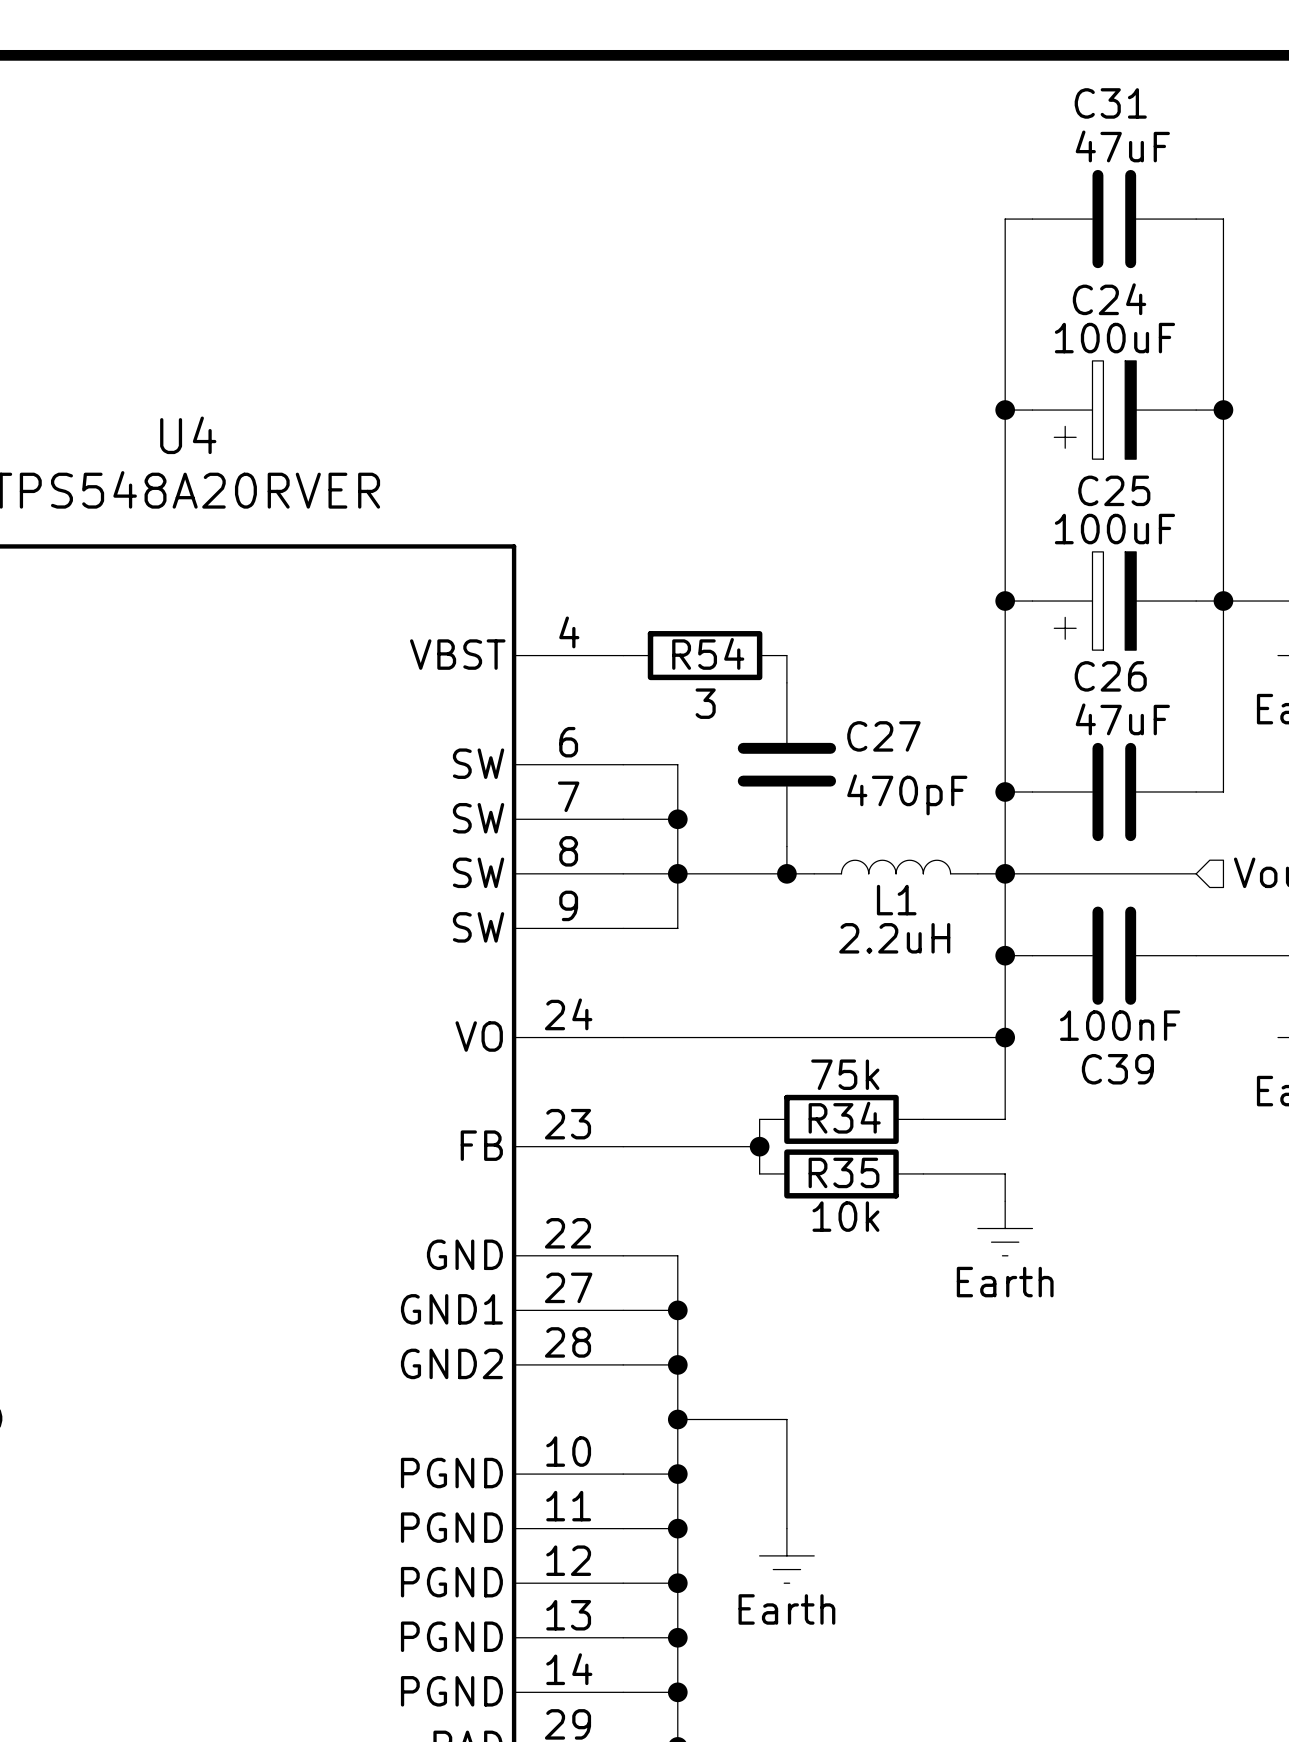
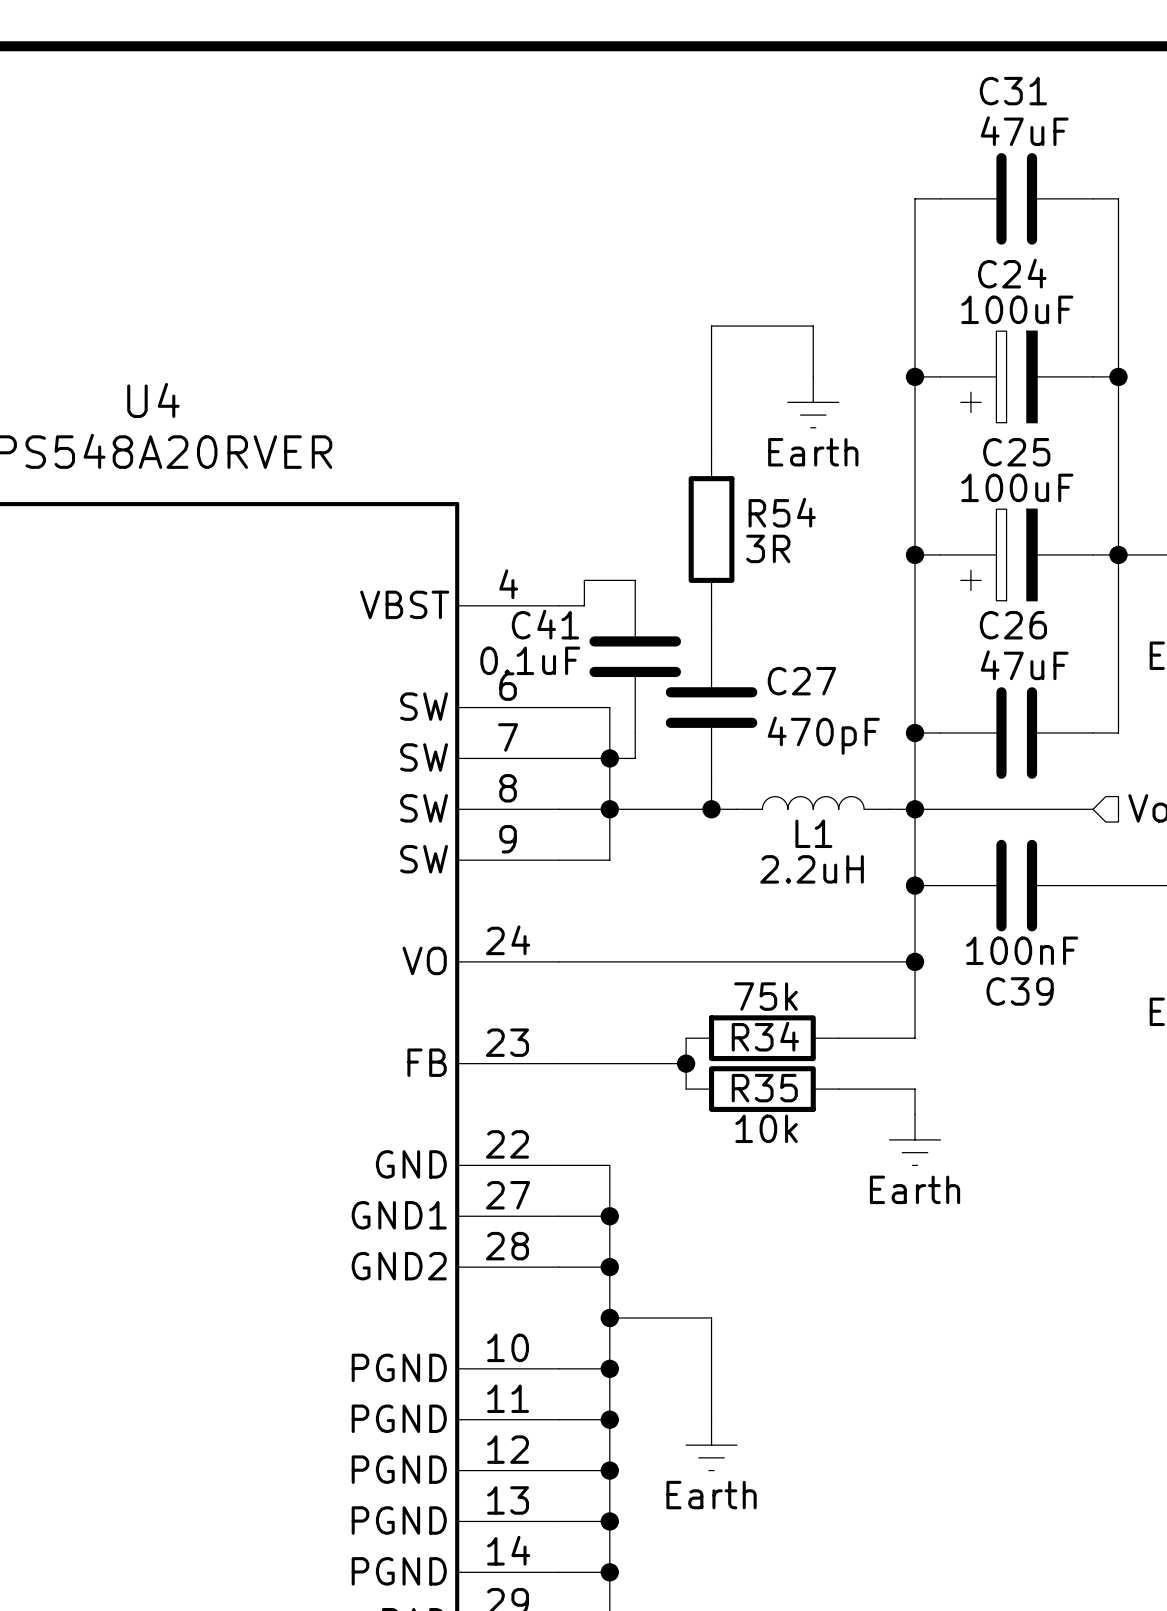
wire: none -> (813, 376) (813, 326) (711, 326) (711, 453)
power symbol: none -> Earth (813, 402)
wire: none -> (635, 580) (584, 580) (584, 605) (558, 605)
R54 name position: R54 (708, 653) -> R54 (782, 512)
R54 rotation: 0° (705, 655) -> 90° clockwise (711, 529)
R54 position: (705, 655) -> (711, 529)
R54 value: 3 (705, 703) -> 3R (768, 548)
C41: none -> 0.1uF (635, 656)
wire: none -> (635, 732) (635, 758) (609, 758)

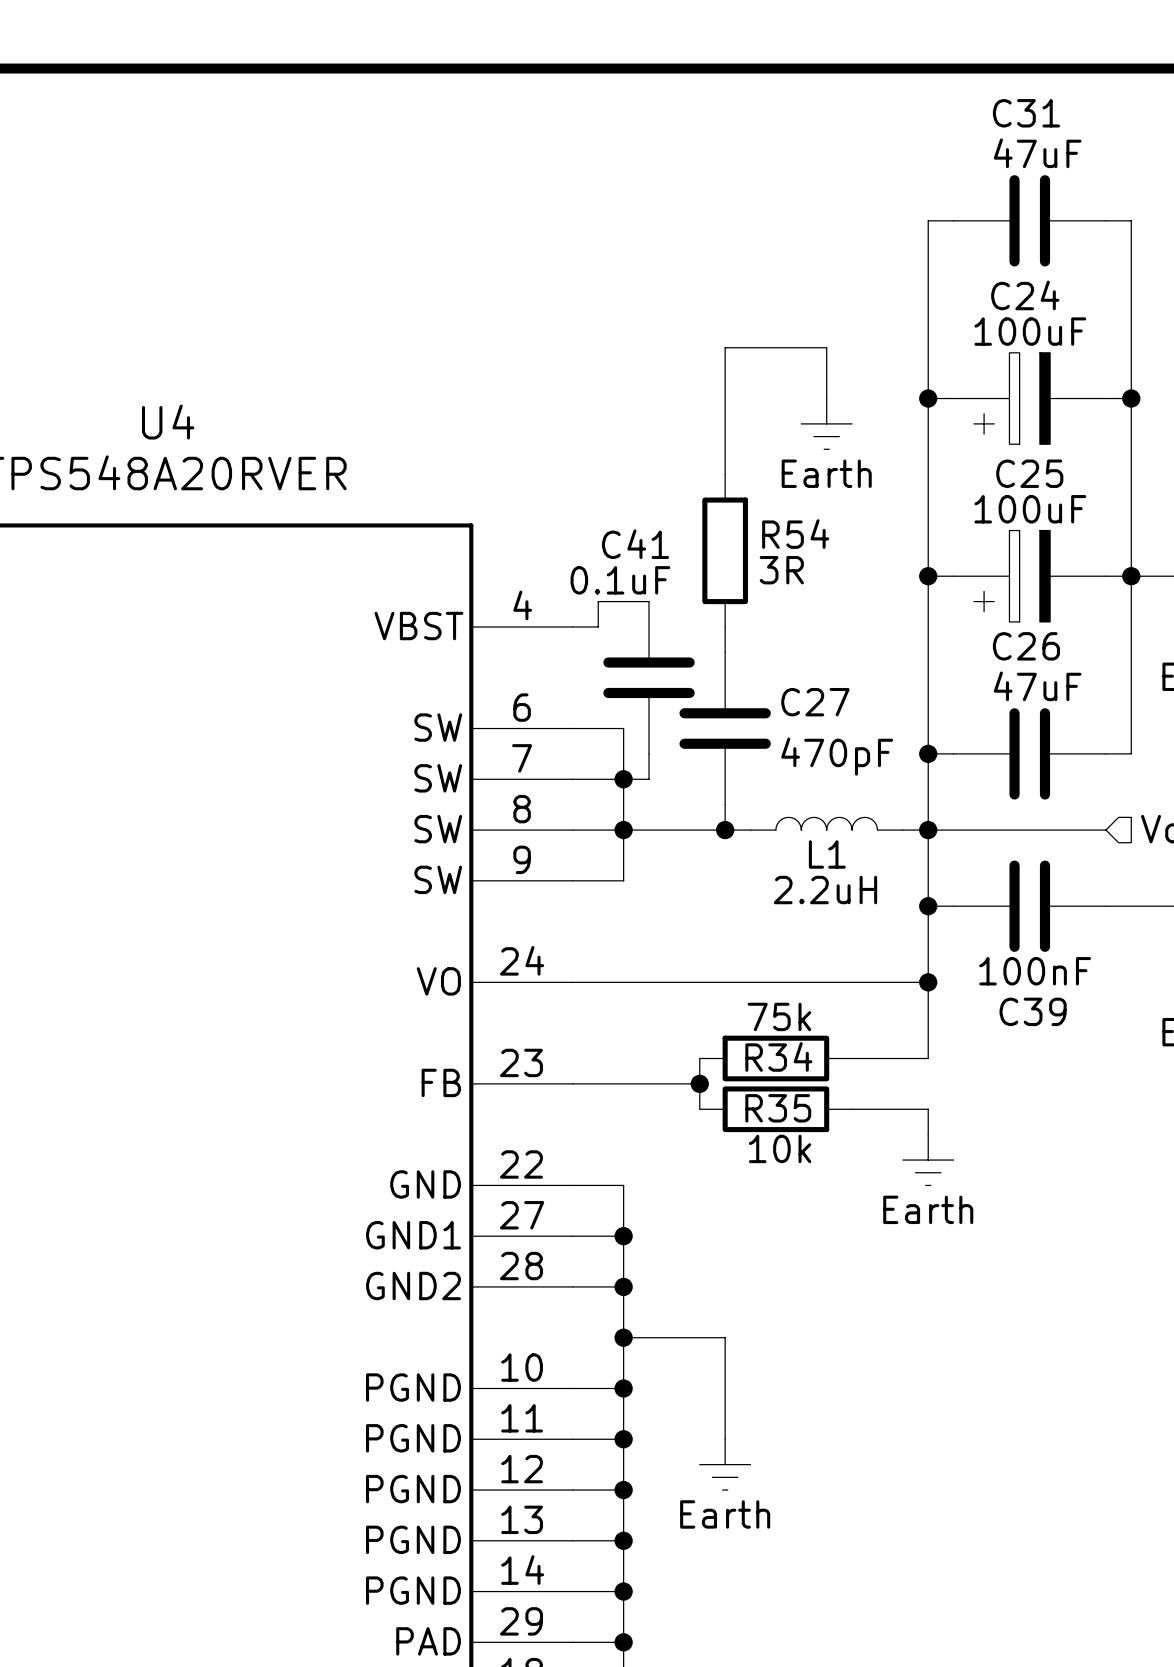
C41 name position: C41 (545, 624) -> C41 (635, 544)
C41 value position: 0.1uF (530, 660) -> 0.1uF (620, 580)

